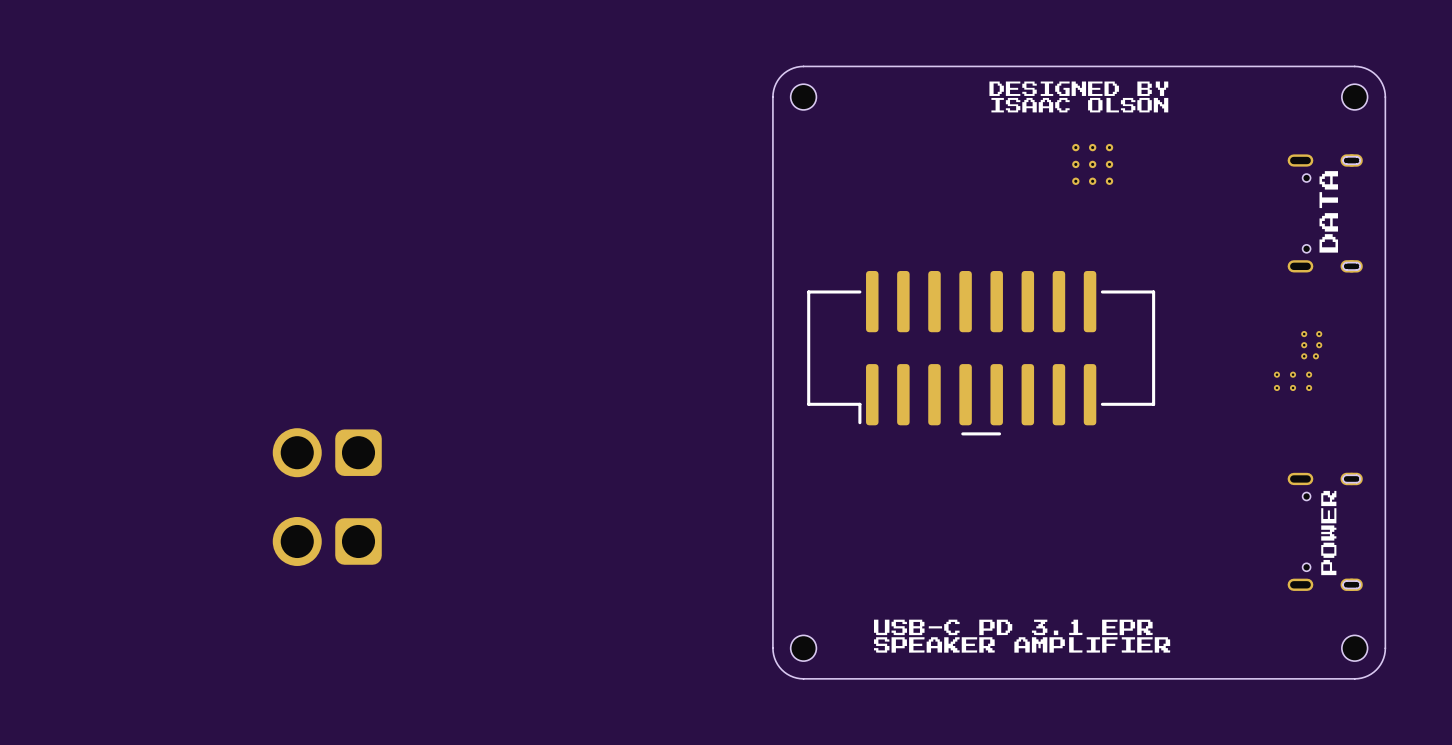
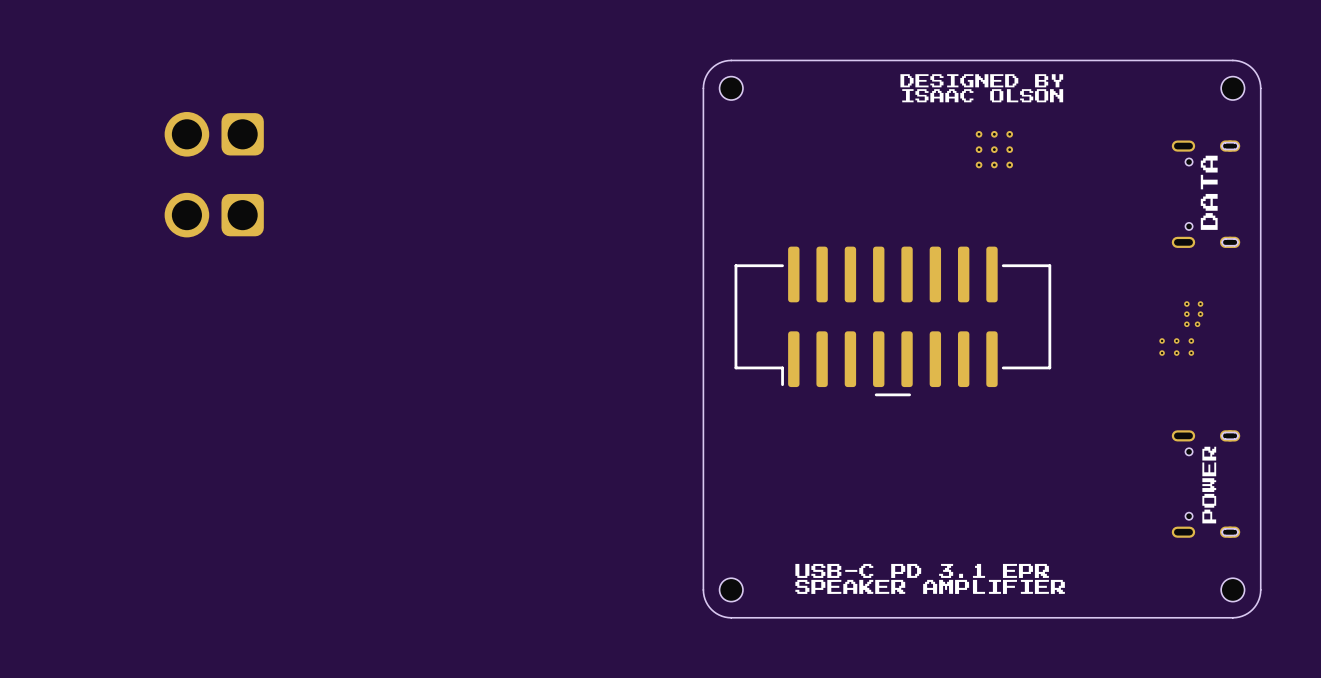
part: none -> (214, 134)
part: none -> (214, 215)
part: (327, 452) -> none
part: (327, 541) -> none

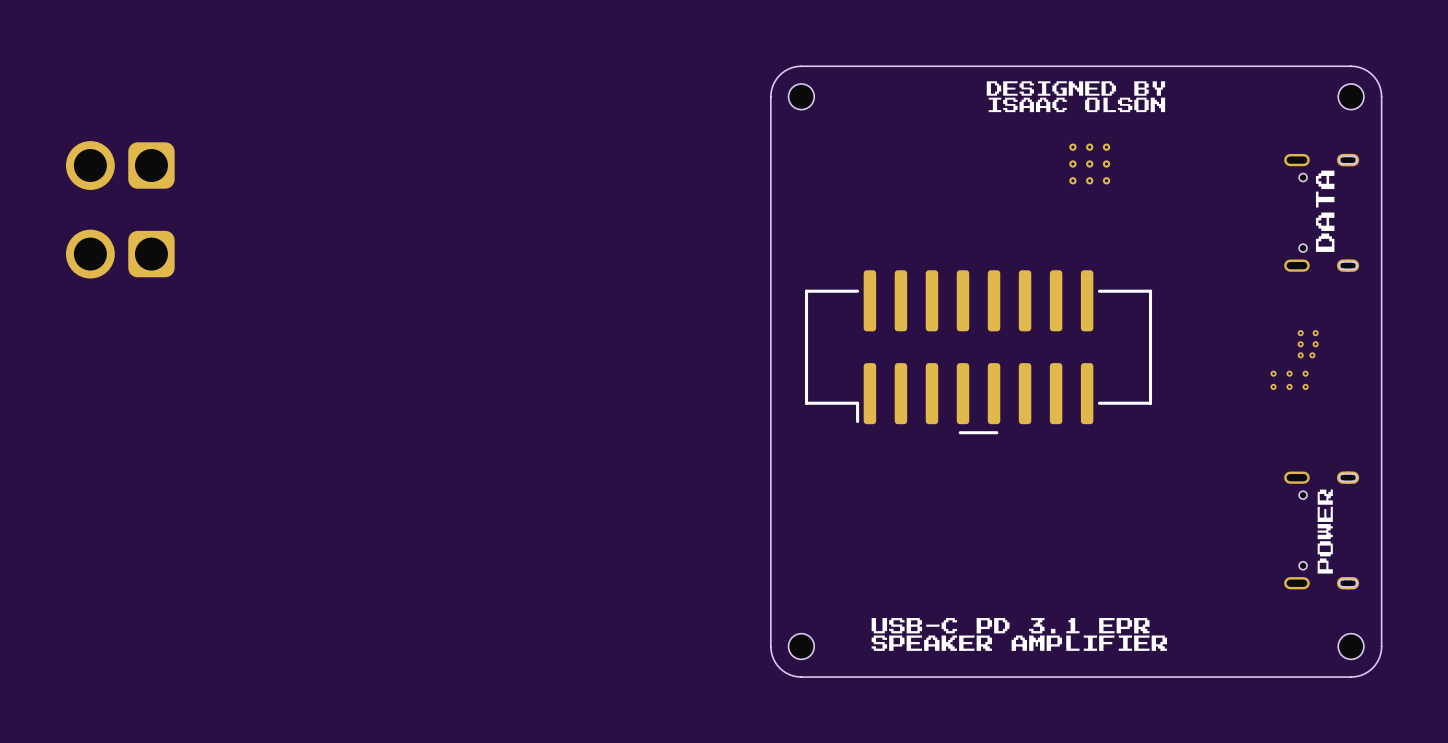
part: (214, 134) -> none
part: none -> (120, 165)
part: (214, 215) -> none
part: none -> (120, 254)

